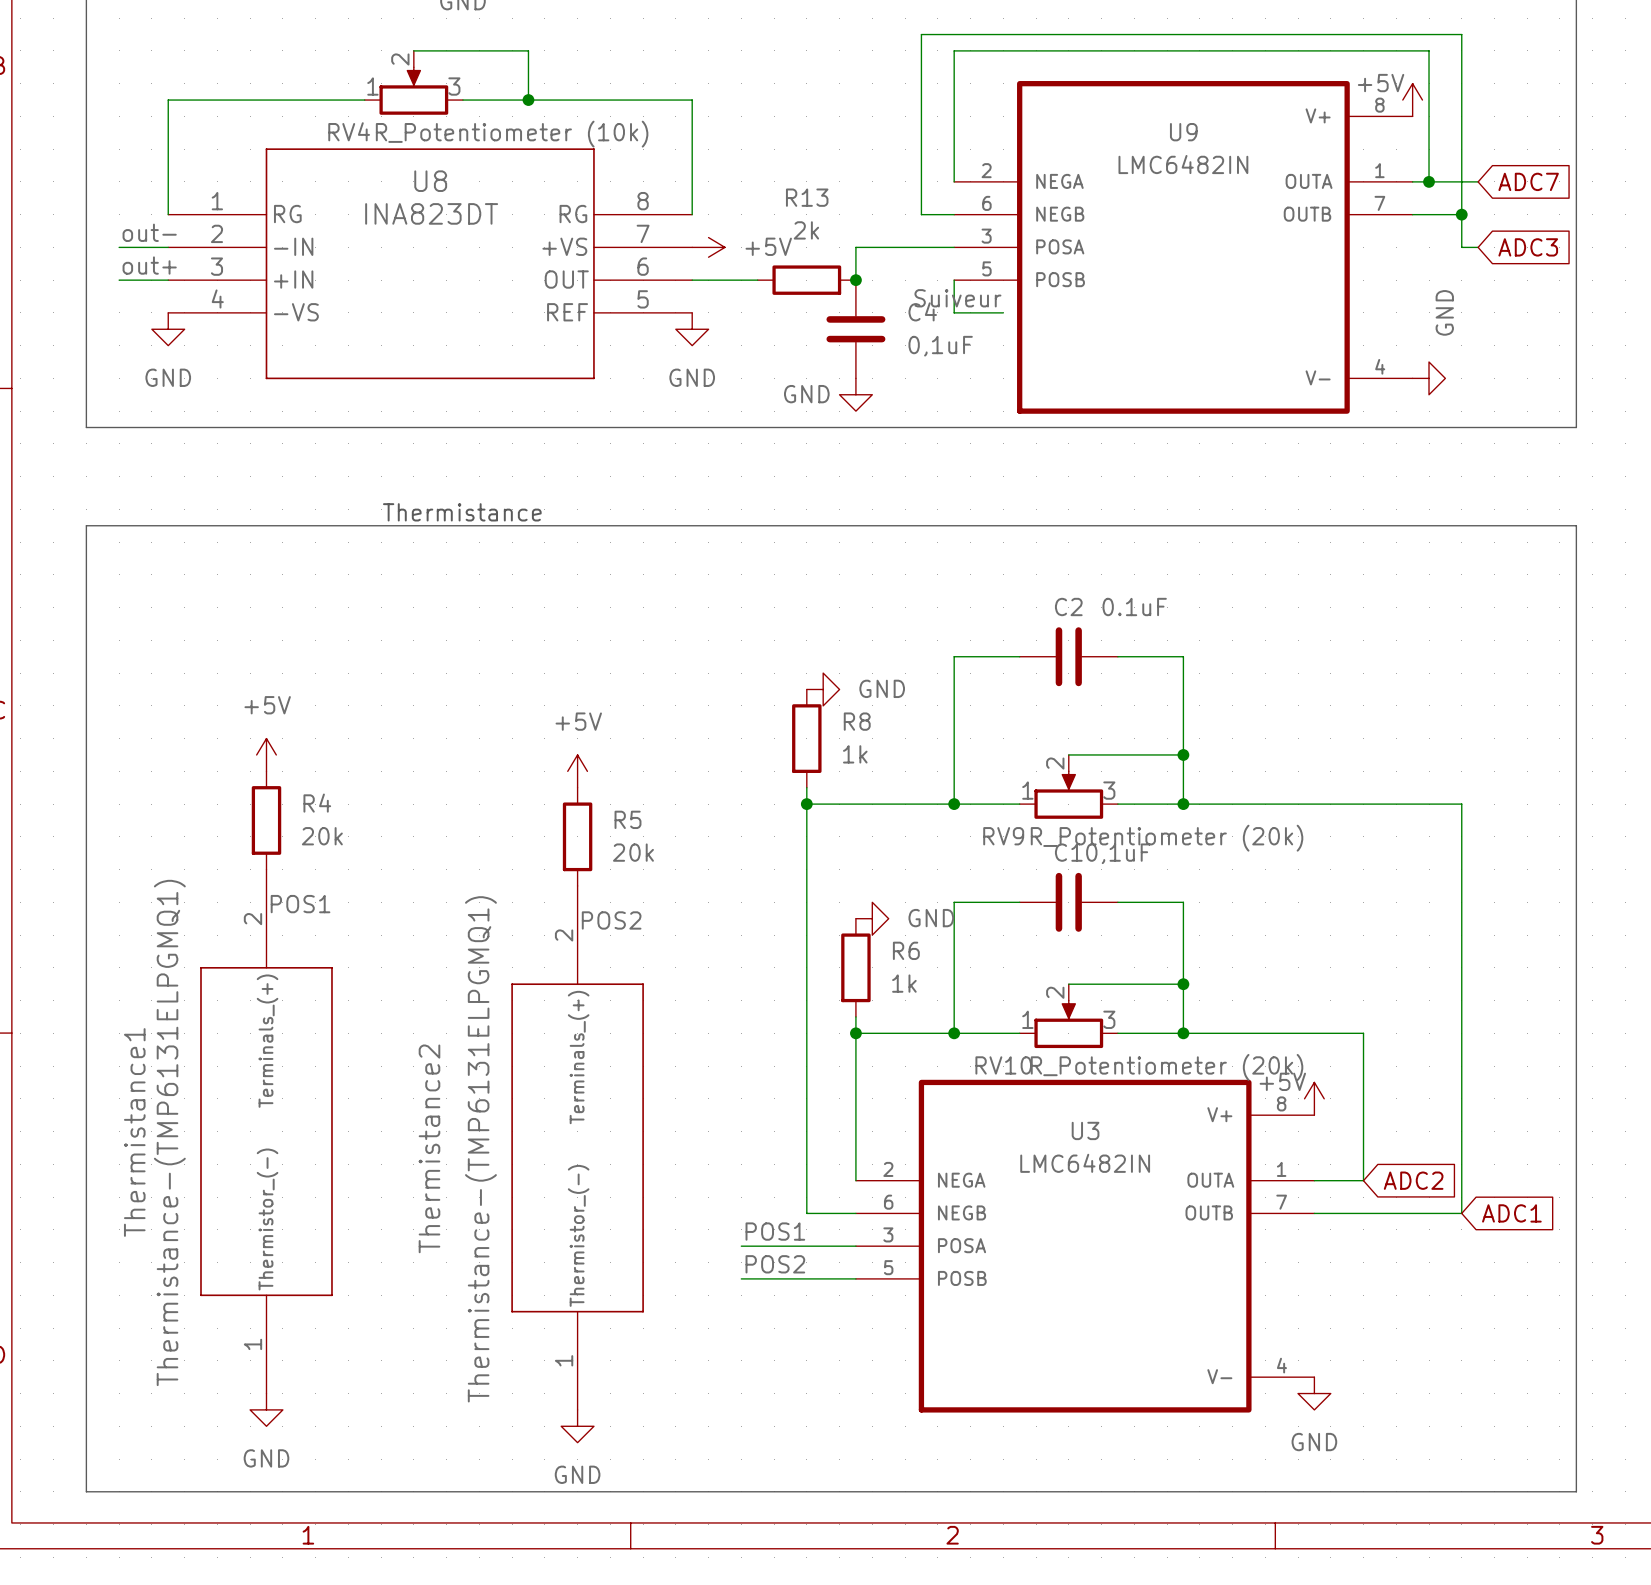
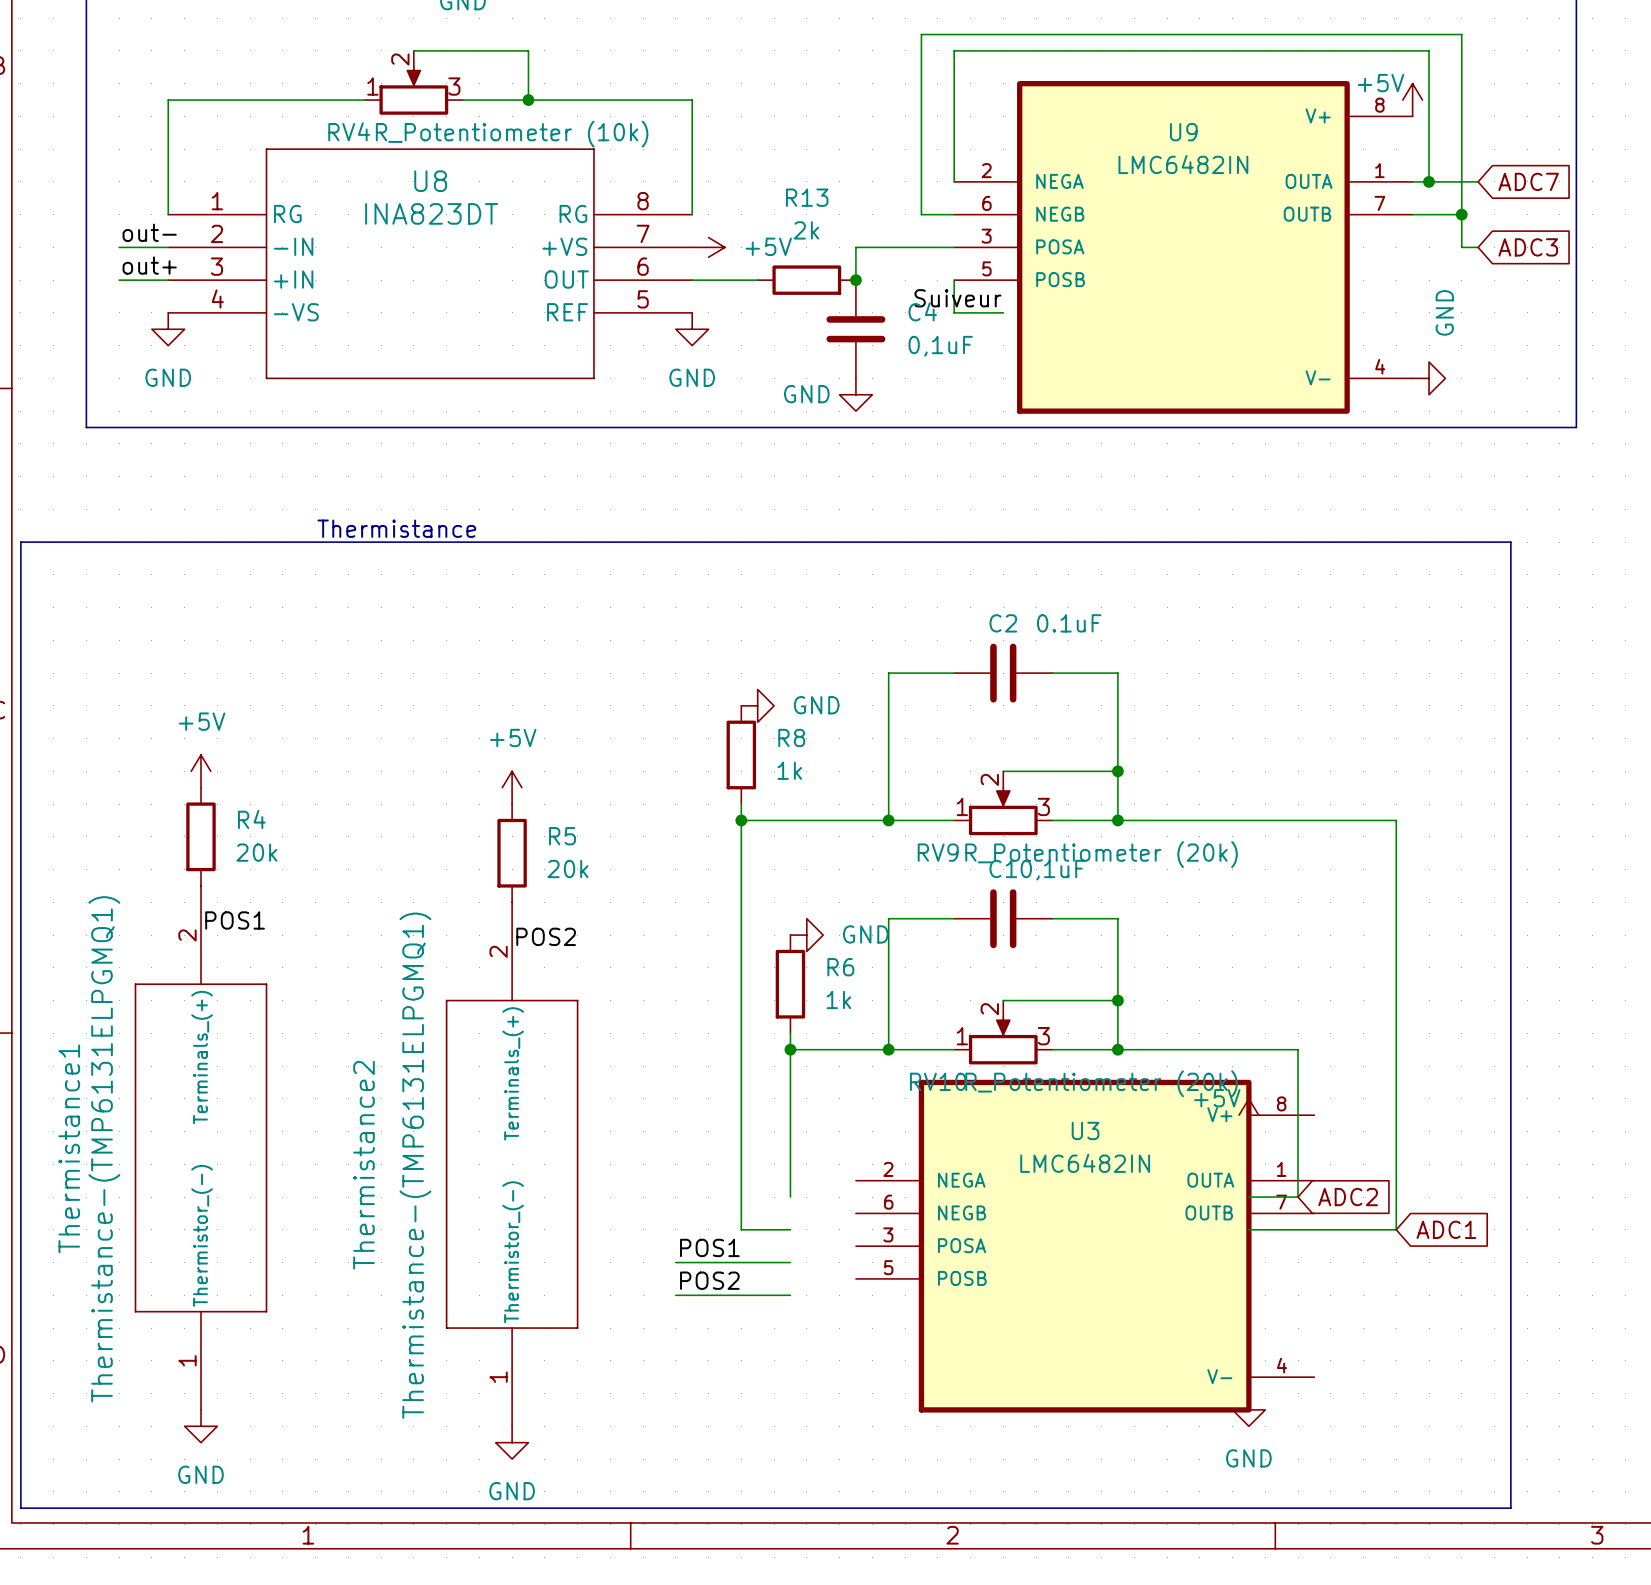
text position: Thermistance (462, 512) -> Thermistance (396, 528)
line: (86, 525) (1576, 525) (1576, 1491) (86, 1491) (86, 525) -> (20, 542) (1510, 542) (1510, 1508) (20, 1508) (20, 542)
wire: (1019, 656) (954, 656) (954, 804) -> (954, 673) (888, 673) (888, 820)
C2 position: (1068, 656) -> (1003, 673)
wire: (1117, 656) (1183, 656) (1183, 804) -> (1052, 673) (1117, 673) (1117, 820)
power symbol position: GND (823, 689) -> GND (757, 705)
R8 position: (806, 738) -> (741, 754)
power symbol position: +5V (266, 754) -> +5V (200, 771)
wire: (1068, 754) (1183, 754) -> (1003, 771) (1117, 771)
junction: (1183, 754) -> none
power symbol position: +5V (577, 771) -> +5V (512, 787)
junction: none -> (1117, 771)
RV9 position: (1068, 786) -> (1003, 803)
wire: (806, 787) (806, 1213) (855, 1213) -> (741, 804) (741, 1229) (790, 1229)
wire: (806, 804) (1019, 804) -> (741, 820) (954, 820)
junction: (806, 804) -> none
junction: (954, 804) -> none
wire: (1117, 804) (1461, 804) (1461, 1213) (1314, 1213) -> (1052, 820) (1396, 820) (1396, 1229) (1248, 1229)
junction: (1183, 804) -> none
R4 position: (266, 820) -> (200, 836)
junction: none -> (741, 820)
junction: none -> (888, 820)
junction: none -> (1117, 820)
R5 position: (577, 836) -> (512, 853)
wire: (1019, 902) (954, 902) (954, 1033) -> (954, 918) (888, 918) (888, 1049)
C1 position: (1068, 902) -> (1003, 918)
wire: (1117, 902) (1183, 902) (1183, 1033) -> (1052, 918) (1117, 918) (1117, 1049)
label position: POS1 (300, 904) -> POS1 (235, 920)
power symbol position: GND (872, 918) -> GND (806, 935)
label position: POS2 (611, 920) -> POS2 (546, 936)
R6 position: (855, 967) -> (790, 984)
wire: (1068, 984) (1183, 984) -> (1003, 1000) (1117, 1000)
junction: (1183, 984) -> none
junction: none -> (1117, 1000)
wire: (855, 1016) (855, 1180) -> (790, 1033) (790, 1197)
RV10 position: (1068, 1016) -> (1003, 1032)
wire: (855, 1033) (1019, 1033) -> (790, 1049) (954, 1049)
junction: (855, 1033) -> none
junction: (954, 1033) -> none
wire: (1117, 1033) (1363, 1033) (1363, 1180) (1314, 1180) -> (1052, 1049) (1298, 1049) (1298, 1197) (1248, 1197)
junction: (1183, 1033) -> none
junction: none -> (790, 1049)
junction: none -> (888, 1049)
junction: none -> (1117, 1049)
power symbol position: +5V (1314, 1098) -> +5V (1248, 1115)
Thermistance1 position: (266, 1131) -> (200, 1147)
Thermistance2 position: (577, 1147) -> (512, 1164)
global label position: ADC2 (1413, 1180) -> ADC2 (1348, 1197)
global label position: ADC1 (1511, 1213) -> ADC1 (1446, 1229)
label position: POS1 (775, 1231) -> POS1 (709, 1247)
wire: (741, 1246) (855, 1246) -> (675, 1262) (790, 1262)
label position: POS2 (775, 1264) -> POS2 (709, 1280)
wire: (741, 1278) (855, 1278) -> (675, 1295) (790, 1295)
power symbol position: GND (1314, 1393) -> GND (1248, 1409)
power symbol position: GND (266, 1409) -> GND (200, 1426)
power symbol position: GND (577, 1426) -> GND (512, 1442)

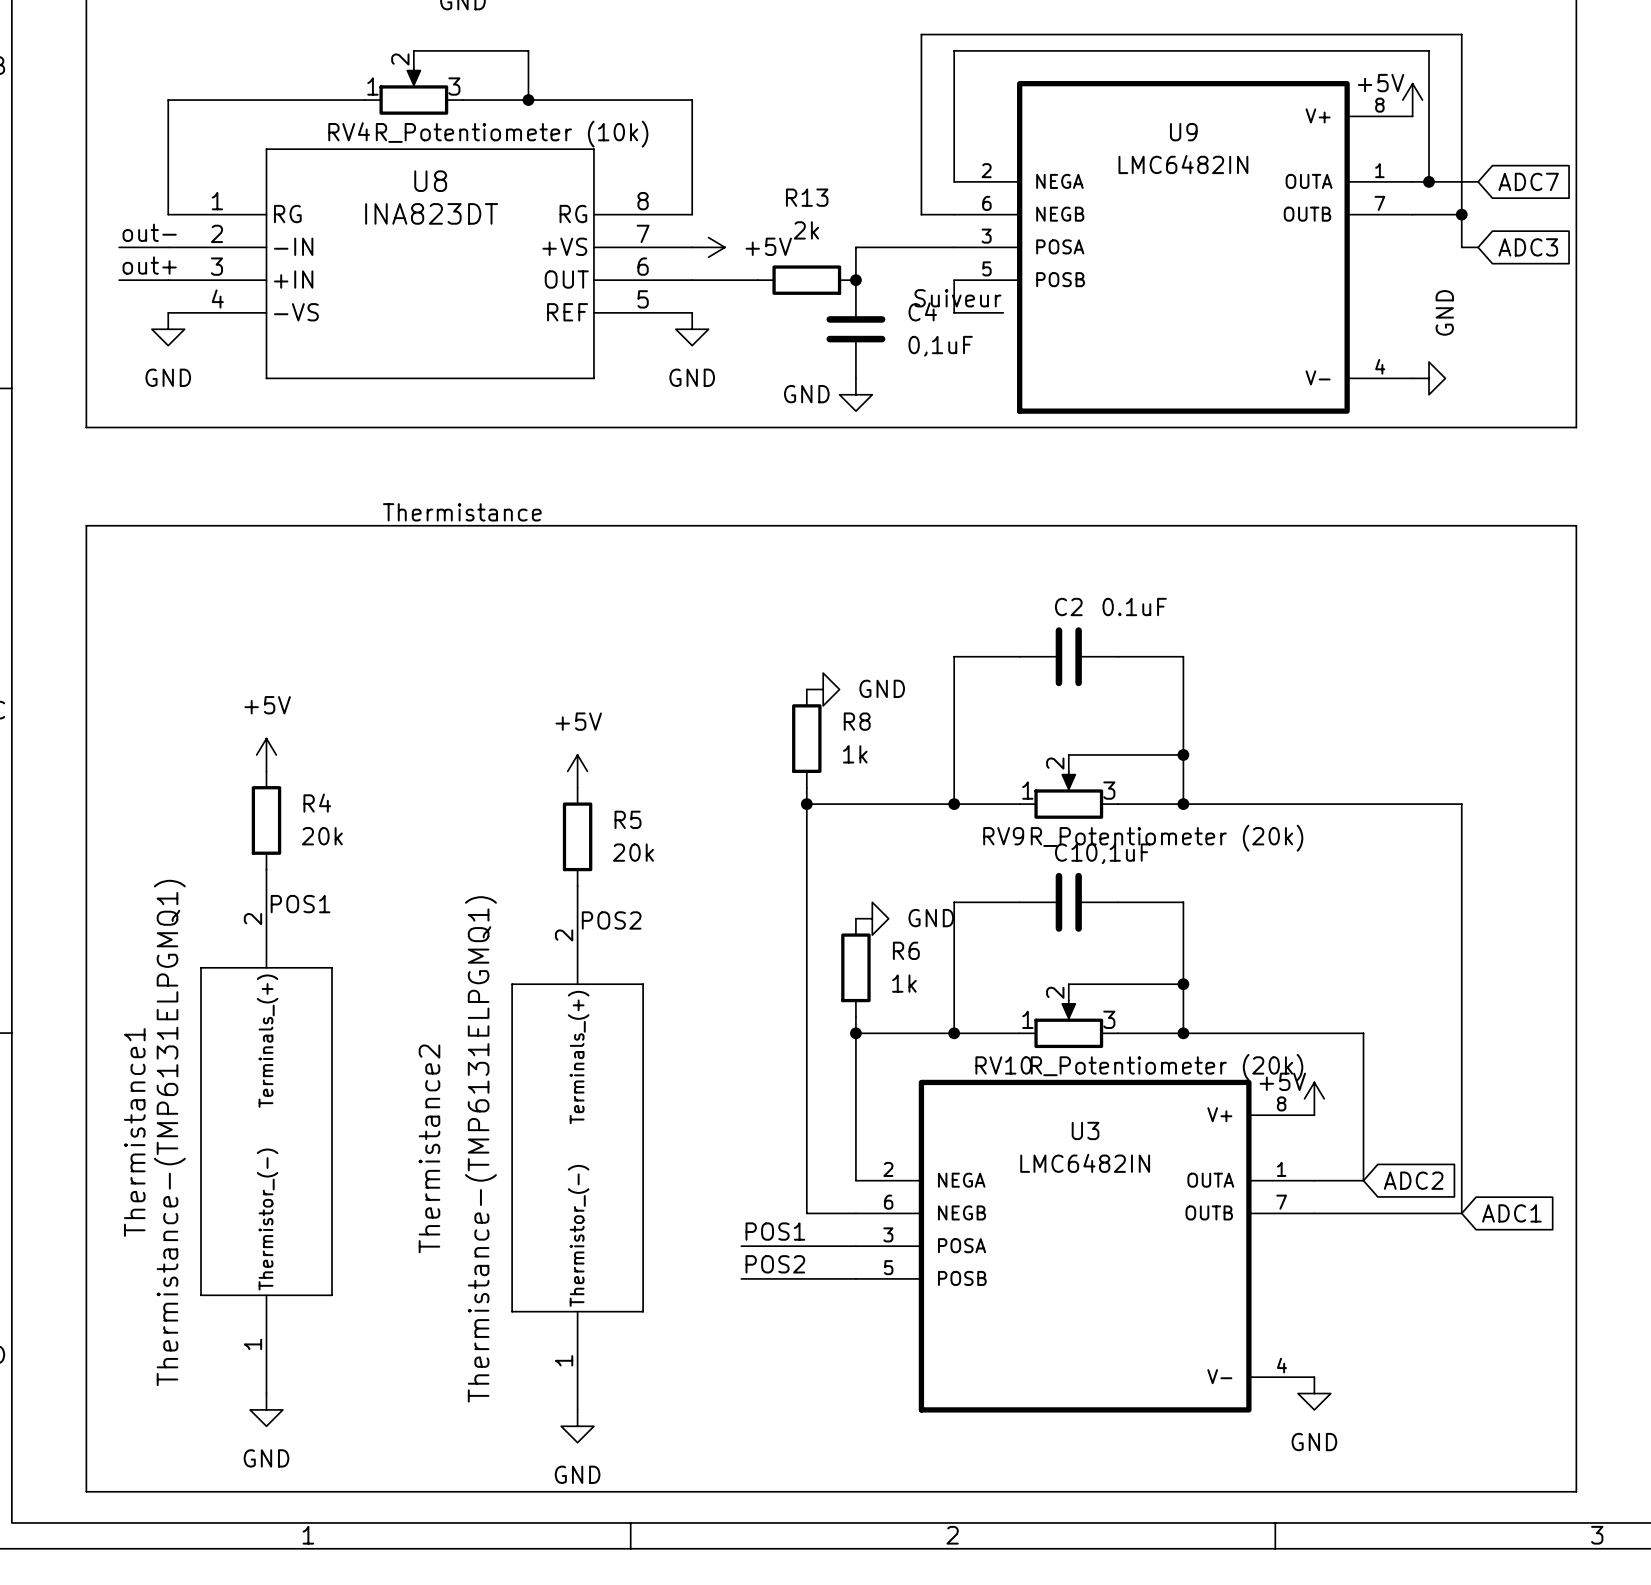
text position: Thermistance (396, 528) -> Thermistance (462, 512)
line: (20, 542) (1510, 542) (1510, 1508) (20, 1508) (20, 542) -> (86, 525) (1576, 525) (1576, 1491) (86, 1491) (86, 525)
wire: (954, 673) (888, 673) (888, 820) -> (1019, 656) (954, 656) (954, 804)
C2 position: (1003, 673) -> (1068, 656)
wire: (1052, 673) (1117, 673) (1117, 820) -> (1117, 656) (1183, 656) (1183, 804)
power symbol position: GND (757, 705) -> GND (823, 689)
R8 position: (741, 754) -> (806, 738)
junction: none -> (1183, 754)
power symbol position: +5V (200, 771) -> +5V (266, 754)
wire: (1003, 771) (1117, 771) -> (1068, 754) (1183, 754)
junction: (1117, 771) -> none
power symbol position: +5V (512, 787) -> +5V (577, 771)
RV9 position: (1003, 803) -> (1068, 786)
wire: (741, 804) (741, 1229) (790, 1229) -> (806, 787) (806, 1213) (855, 1213)
junction: none -> (806, 804)
junction: none -> (954, 804)
junction: none -> (1183, 804)
wire: (741, 820) (954, 820) -> (806, 804) (1019, 804)
junction: (741, 820) -> none
junction: (888, 820) -> none
wire: (1052, 820) (1396, 820) (1396, 1229) (1248, 1229) -> (1117, 804) (1461, 804) (1461, 1213) (1314, 1213)
junction: (1117, 820) -> none
R4 position: (200, 836) -> (266, 820)
R5 position: (512, 853) -> (577, 836)
wire: (954, 918) (888, 918) (888, 1049) -> (1019, 902) (954, 902) (954, 1033)
C1 position: (1003, 918) -> (1068, 902)
wire: (1052, 918) (1117, 918) (1117, 1049) -> (1117, 902) (1183, 902) (1183, 1033)
label position: POS1 (235, 920) -> POS1 (300, 904)
power symbol position: GND (806, 935) -> GND (872, 918)
label position: POS2 (546, 936) -> POS2 (611, 920)
R6 position: (790, 984) -> (855, 967)
junction: none -> (1183, 984)
wire: (1003, 1000) (1117, 1000) -> (1068, 984) (1183, 984)
junction: (1117, 1000) -> none
RV10 position: (1003, 1032) -> (1068, 1016)
wire: (790, 1033) (790, 1197) -> (855, 1016) (855, 1180)
junction: none -> (855, 1033)
junction: none -> (954, 1033)
junction: none -> (1183, 1033)
wire: (790, 1049) (954, 1049) -> (855, 1033) (1019, 1033)
junction: (790, 1049) -> none
junction: (888, 1049) -> none
wire: (1052, 1049) (1298, 1049) (1298, 1197) (1248, 1197) -> (1117, 1033) (1363, 1033) (1363, 1180) (1314, 1180)
junction: (1117, 1049) -> none
power symbol position: +5V (1248, 1115) -> +5V (1314, 1098)
Thermistance1 position: (200, 1147) -> (266, 1131)
Thermistance2 position: (512, 1164) -> (577, 1147)
global label position: ADC2 (1348, 1197) -> ADC2 (1413, 1180)
global label position: ADC1 (1446, 1229) -> ADC1 (1511, 1213)
label position: POS1 (709, 1247) -> POS1 (775, 1231)
wire: (675, 1262) (790, 1262) -> (741, 1246) (855, 1246)
label position: POS2 (709, 1280) -> POS2 (775, 1264)
wire: (675, 1295) (790, 1295) -> (741, 1278) (855, 1278)
power symbol position: GND (1248, 1409) -> GND (1314, 1393)
power symbol position: GND (200, 1426) -> GND (266, 1409)
power symbol position: GND (512, 1442) -> GND (577, 1426)

